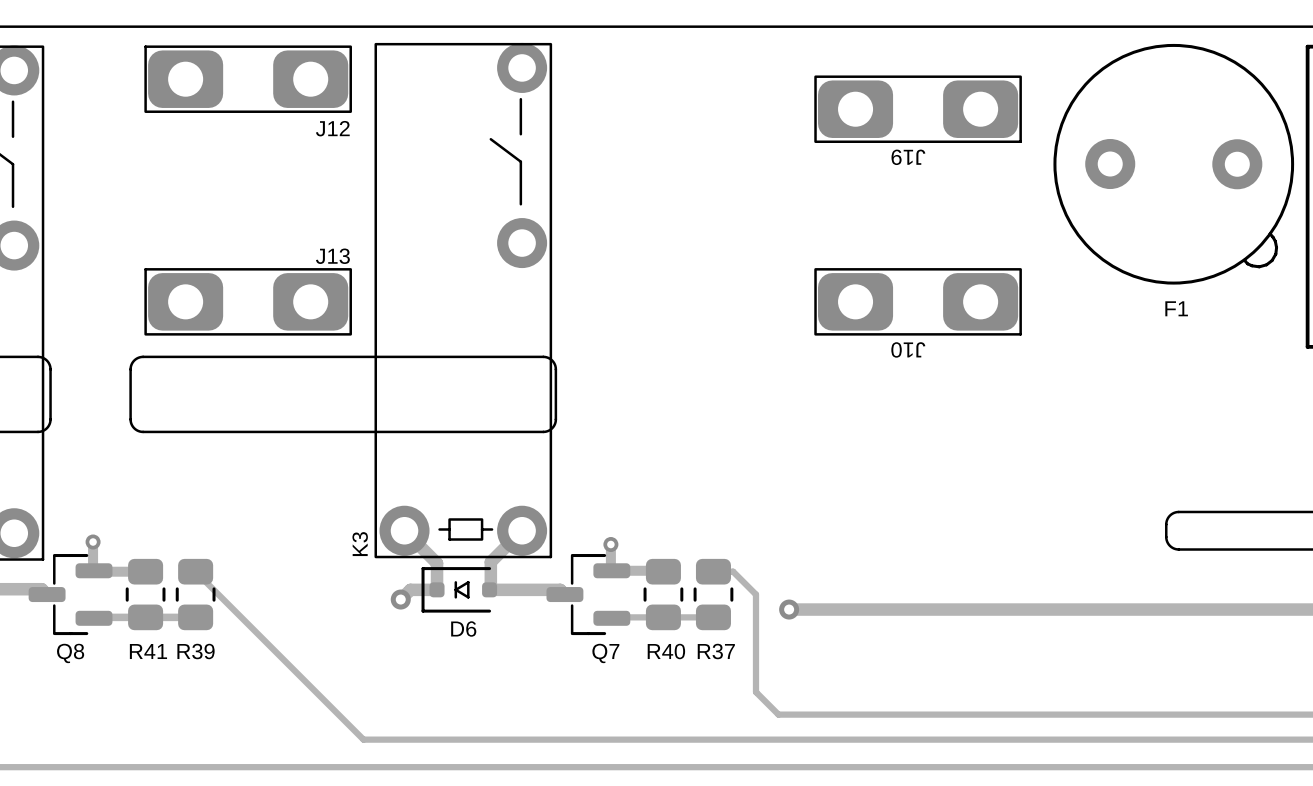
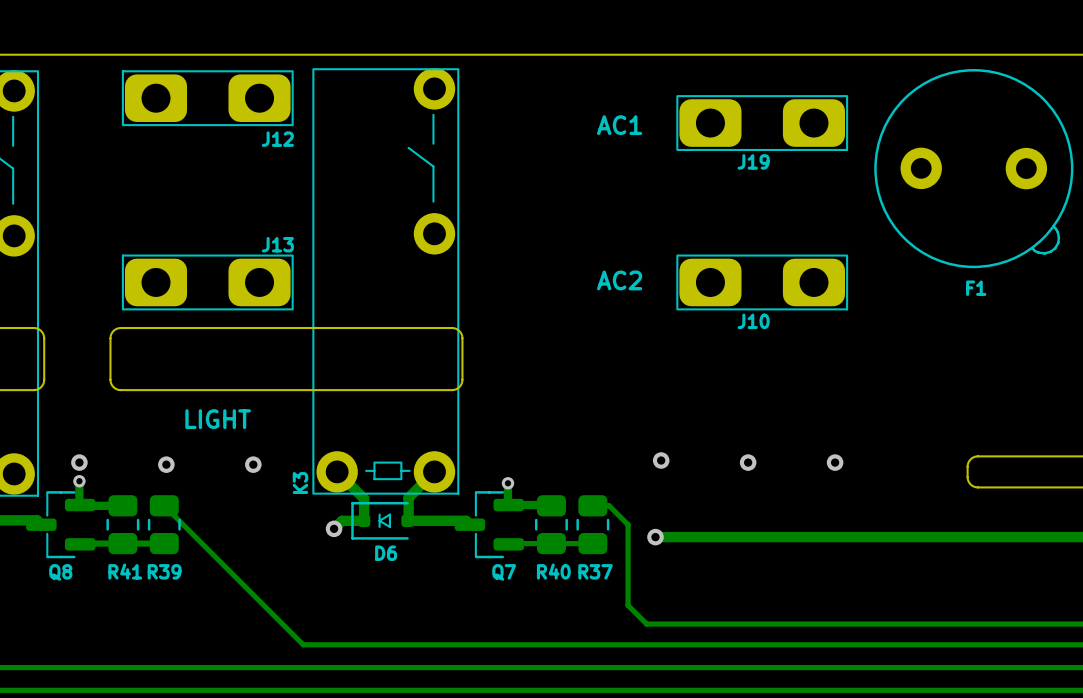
text: none -> AC1 (619, 125)
J19 name rotation: 0° (908, 157) -> 180° (753, 161)
text: none -> AC2 (619, 280)
J10 name rotation: 0° (908, 349) -> 180° (753, 321)
text: none -> LIGHT (218, 419)
via: none -> (661, 460)
via: none -> (79, 462)
via: none -> (748, 462)
via: none -> (835, 462)
via: none -> (166, 464)
via: none -> (253, 464)

